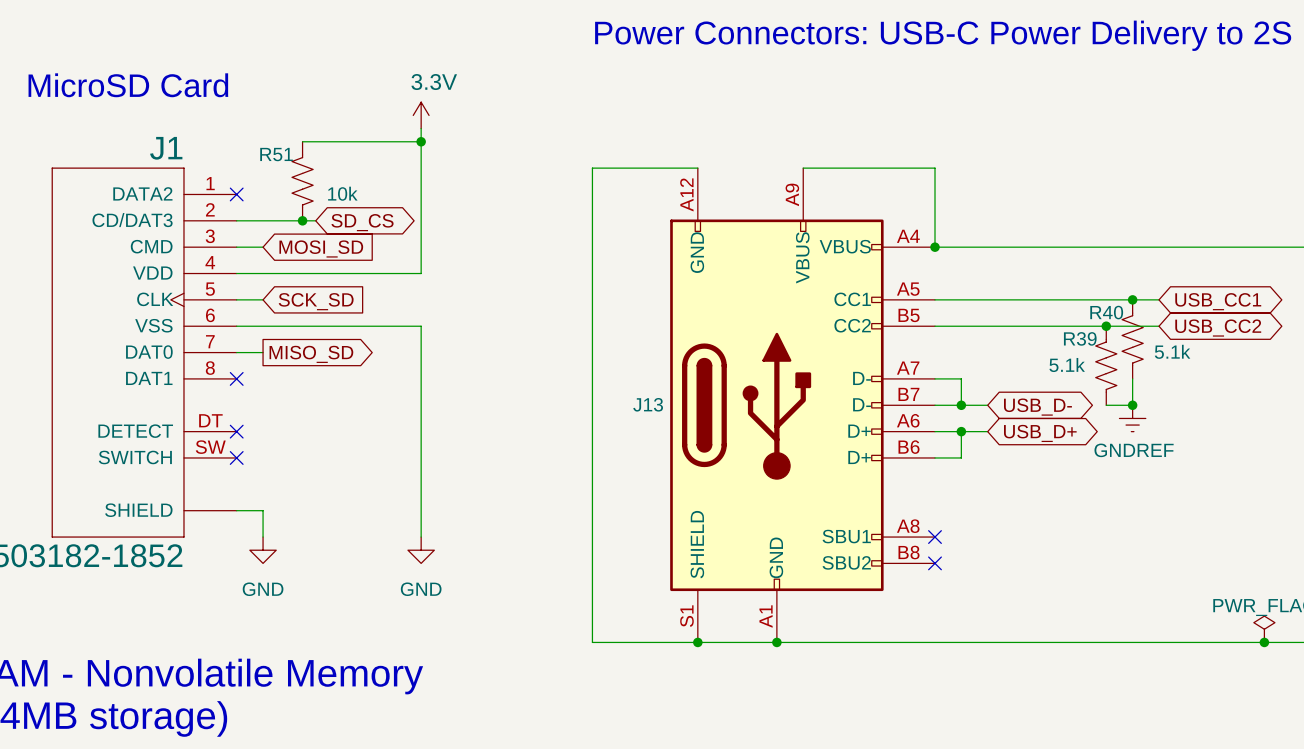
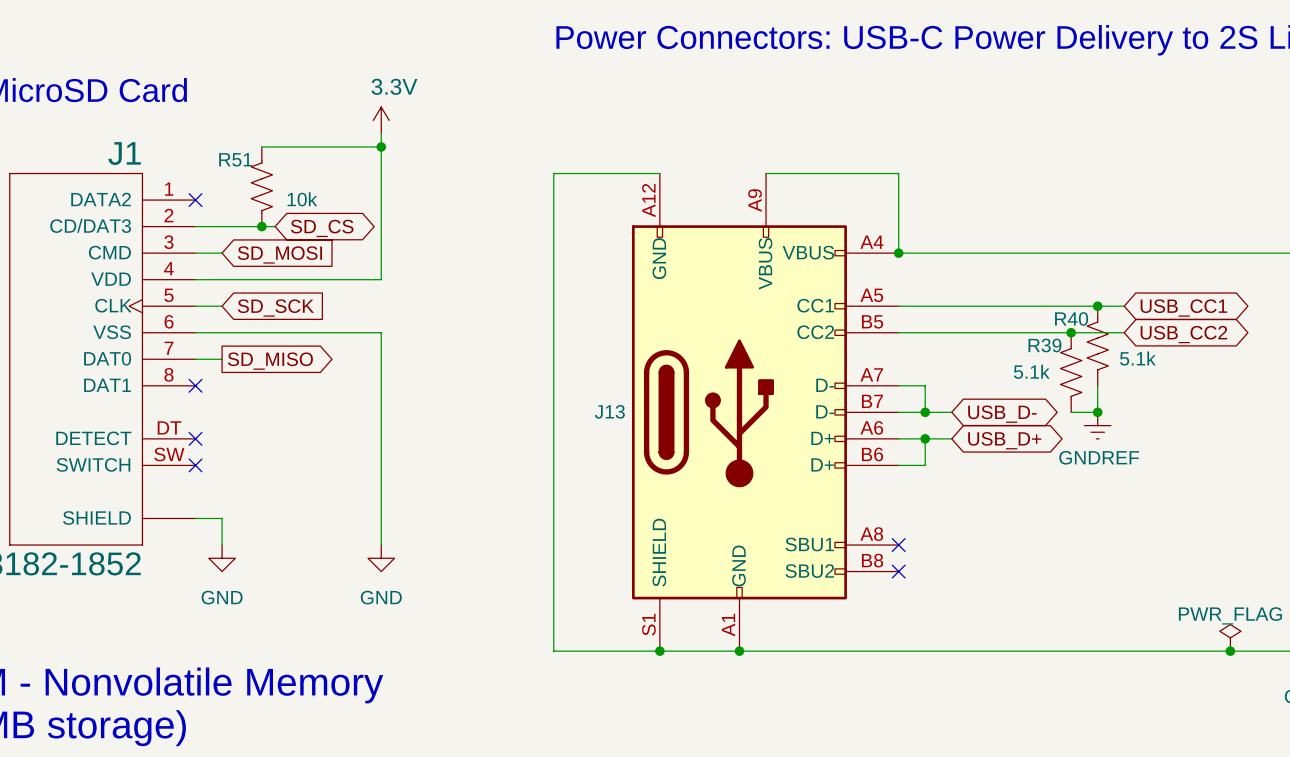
global label: MOSI_SD (321, 248) -> SD_MOSI (279, 254)
global label: SCK_SD (316, 301) -> SD_SCK (275, 308)
global label: MISO_SD (311, 354) -> SD_MISO (270, 361)

